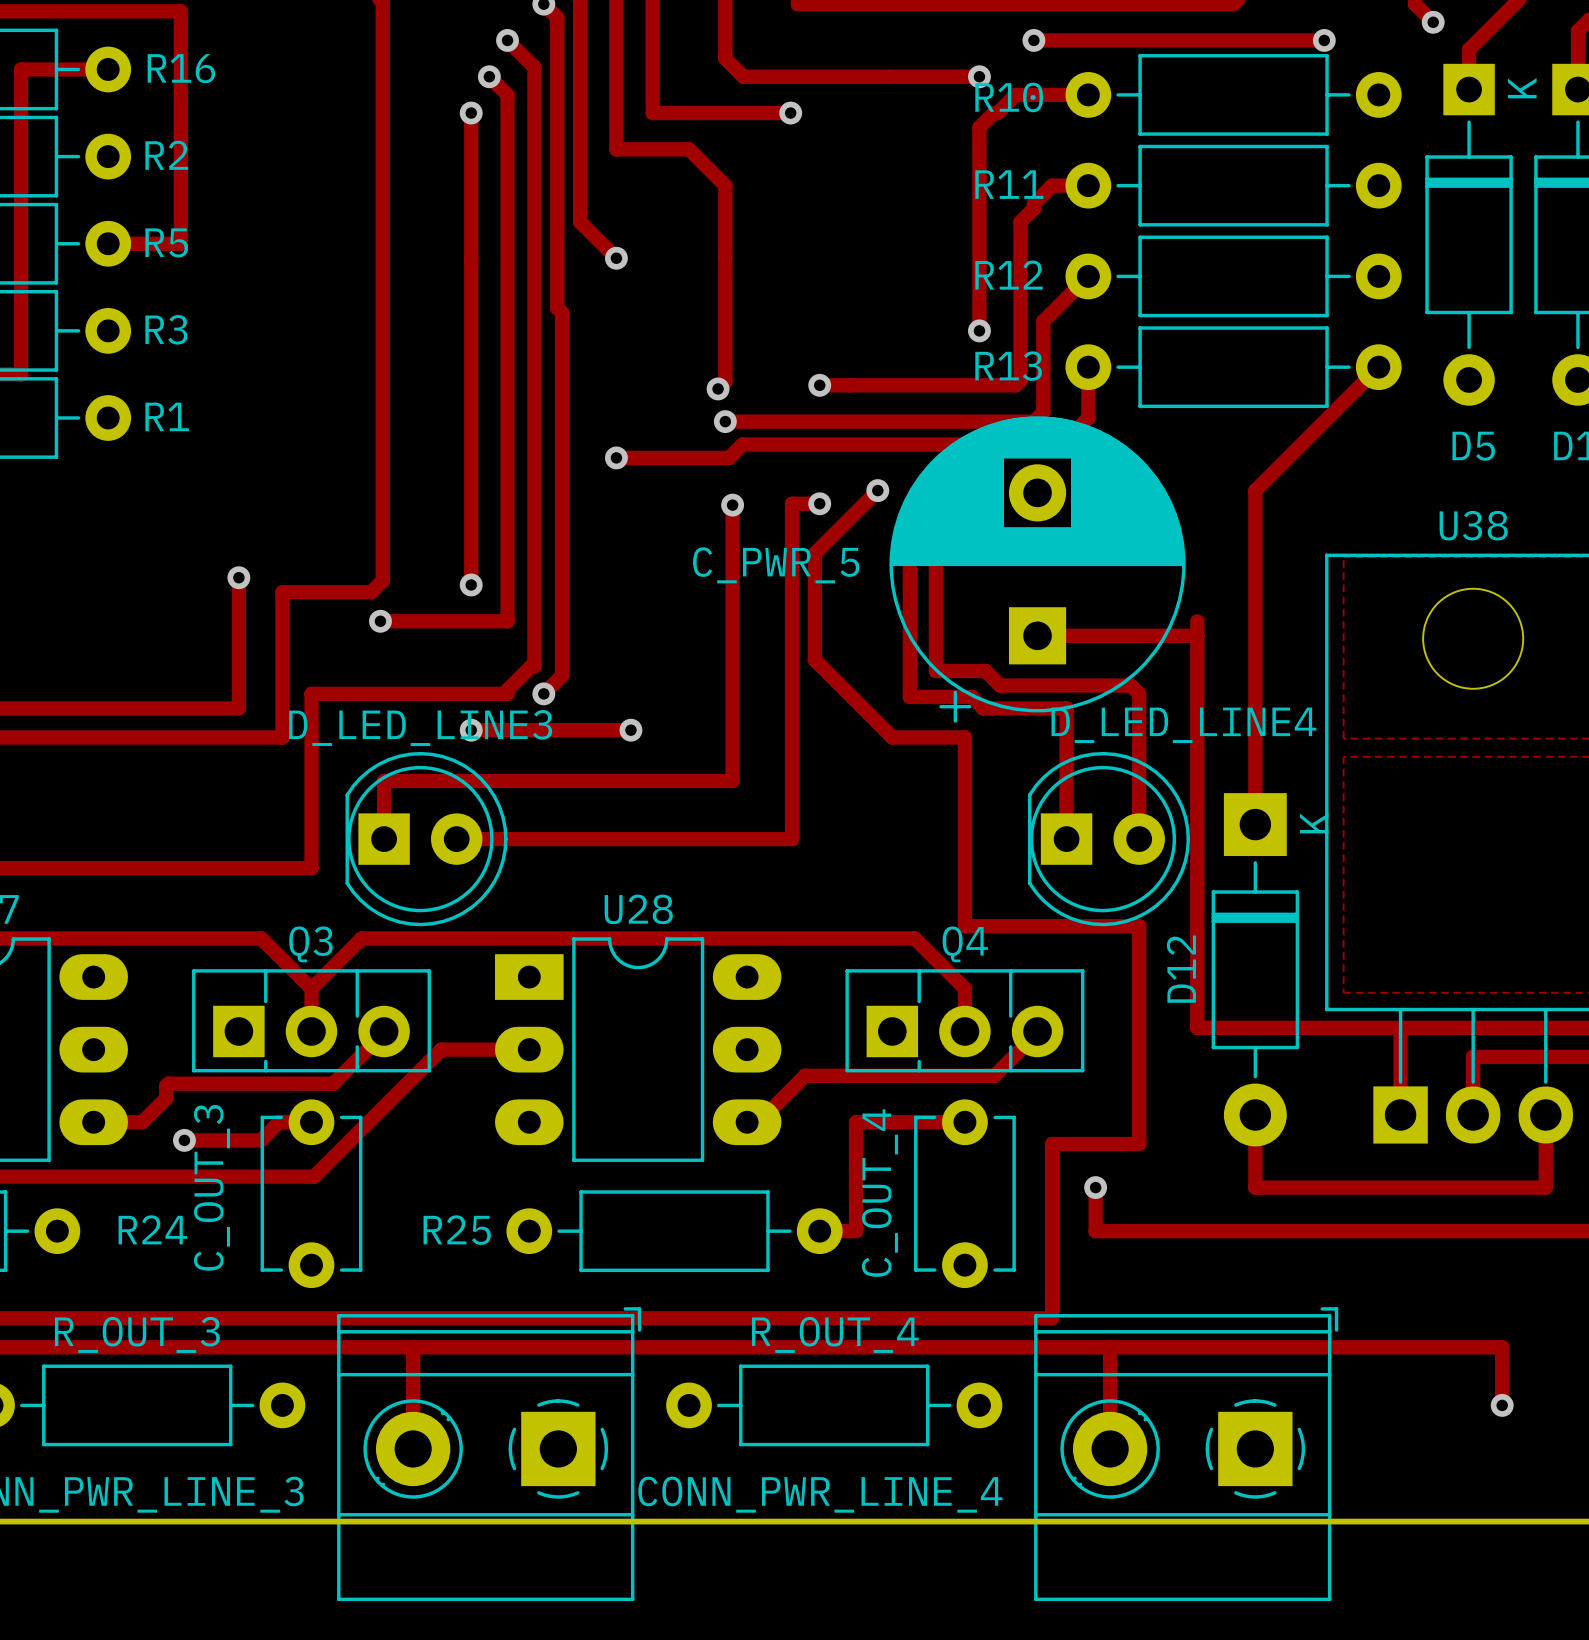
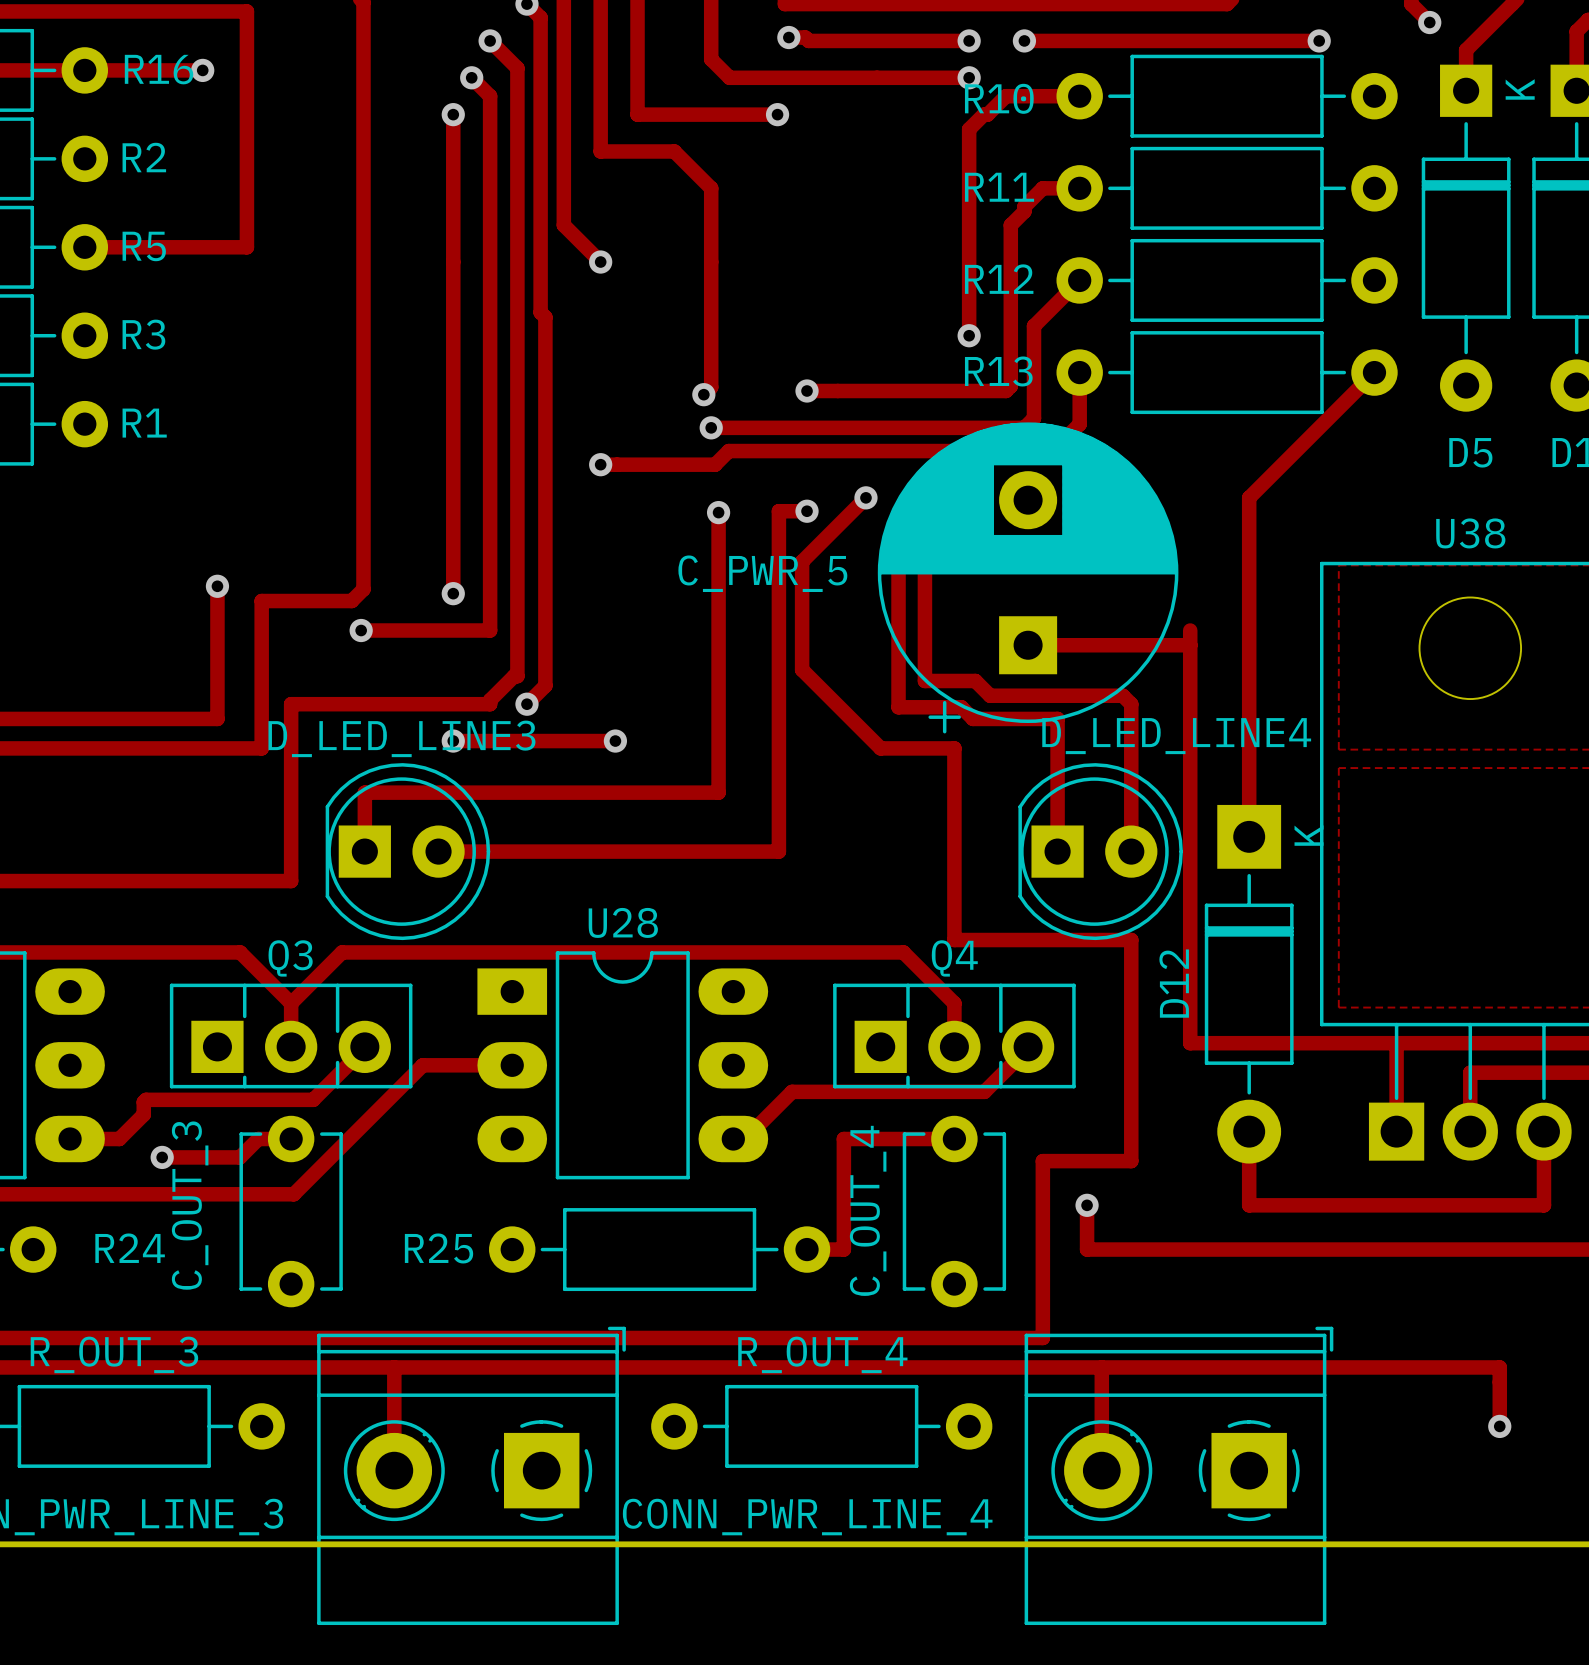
track: (180, 11) (180, 243) -> (158, 11) (246, 11) (246, 247) (158, 247)
track: none -> (788, 37) (805, 37) (808, 40) (969, 40)
via: none -> (788, 37)
via: none -> (969, 40)
track: none -> (84, 70) (202, 70)
via: none -> (202, 70)

